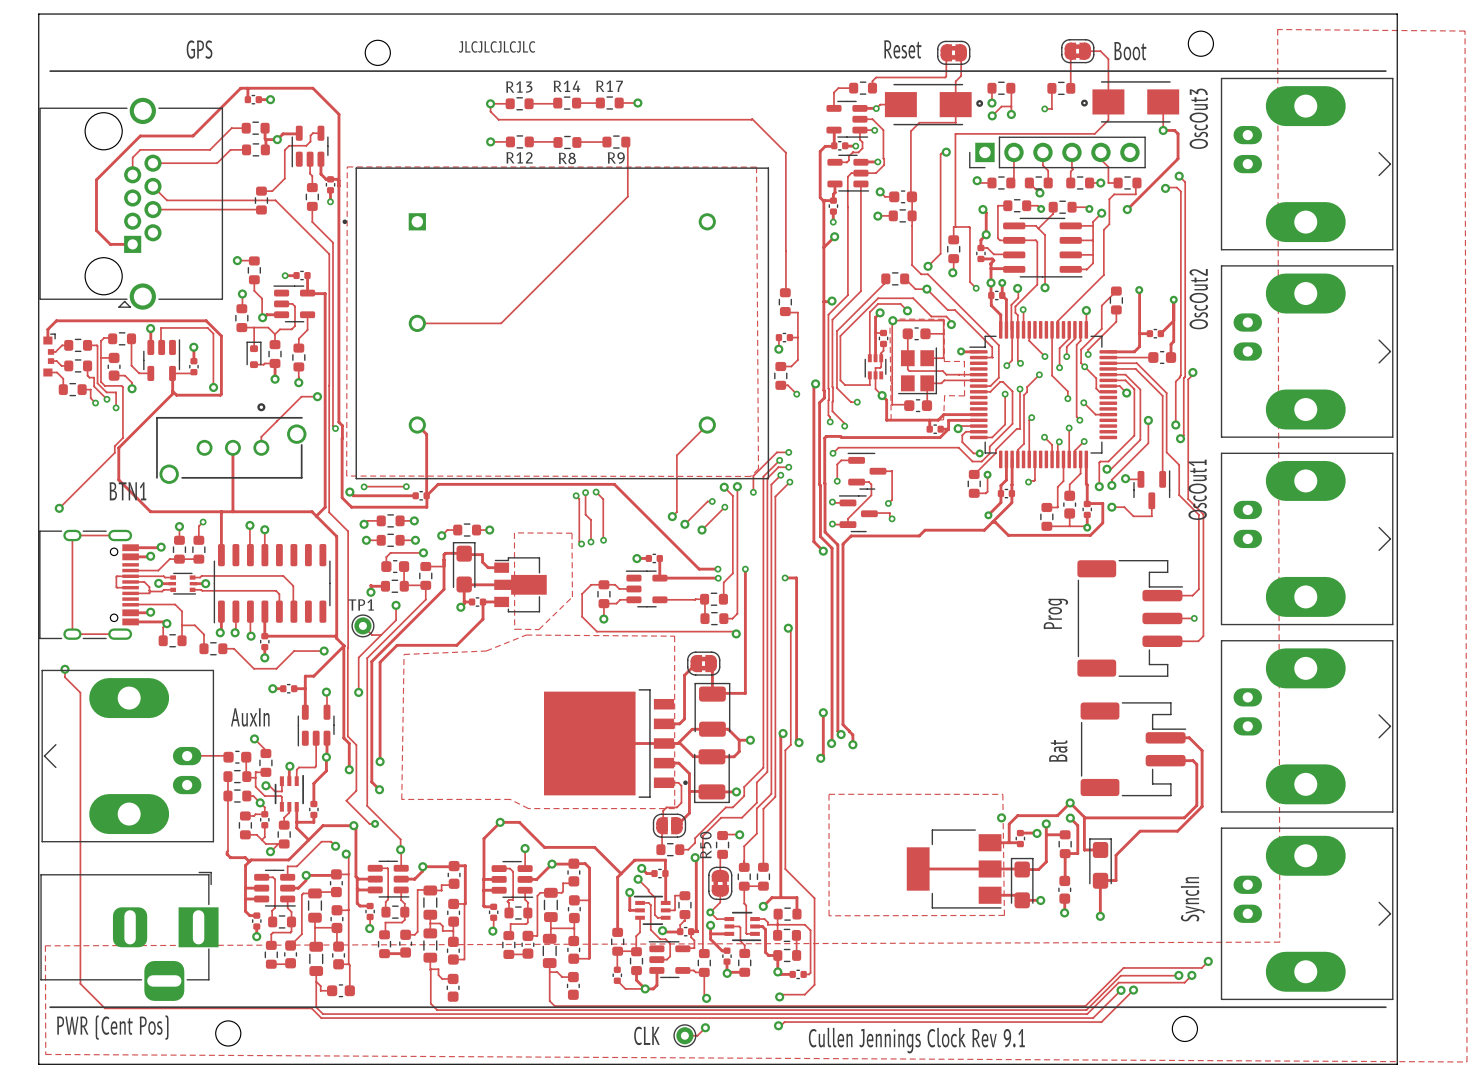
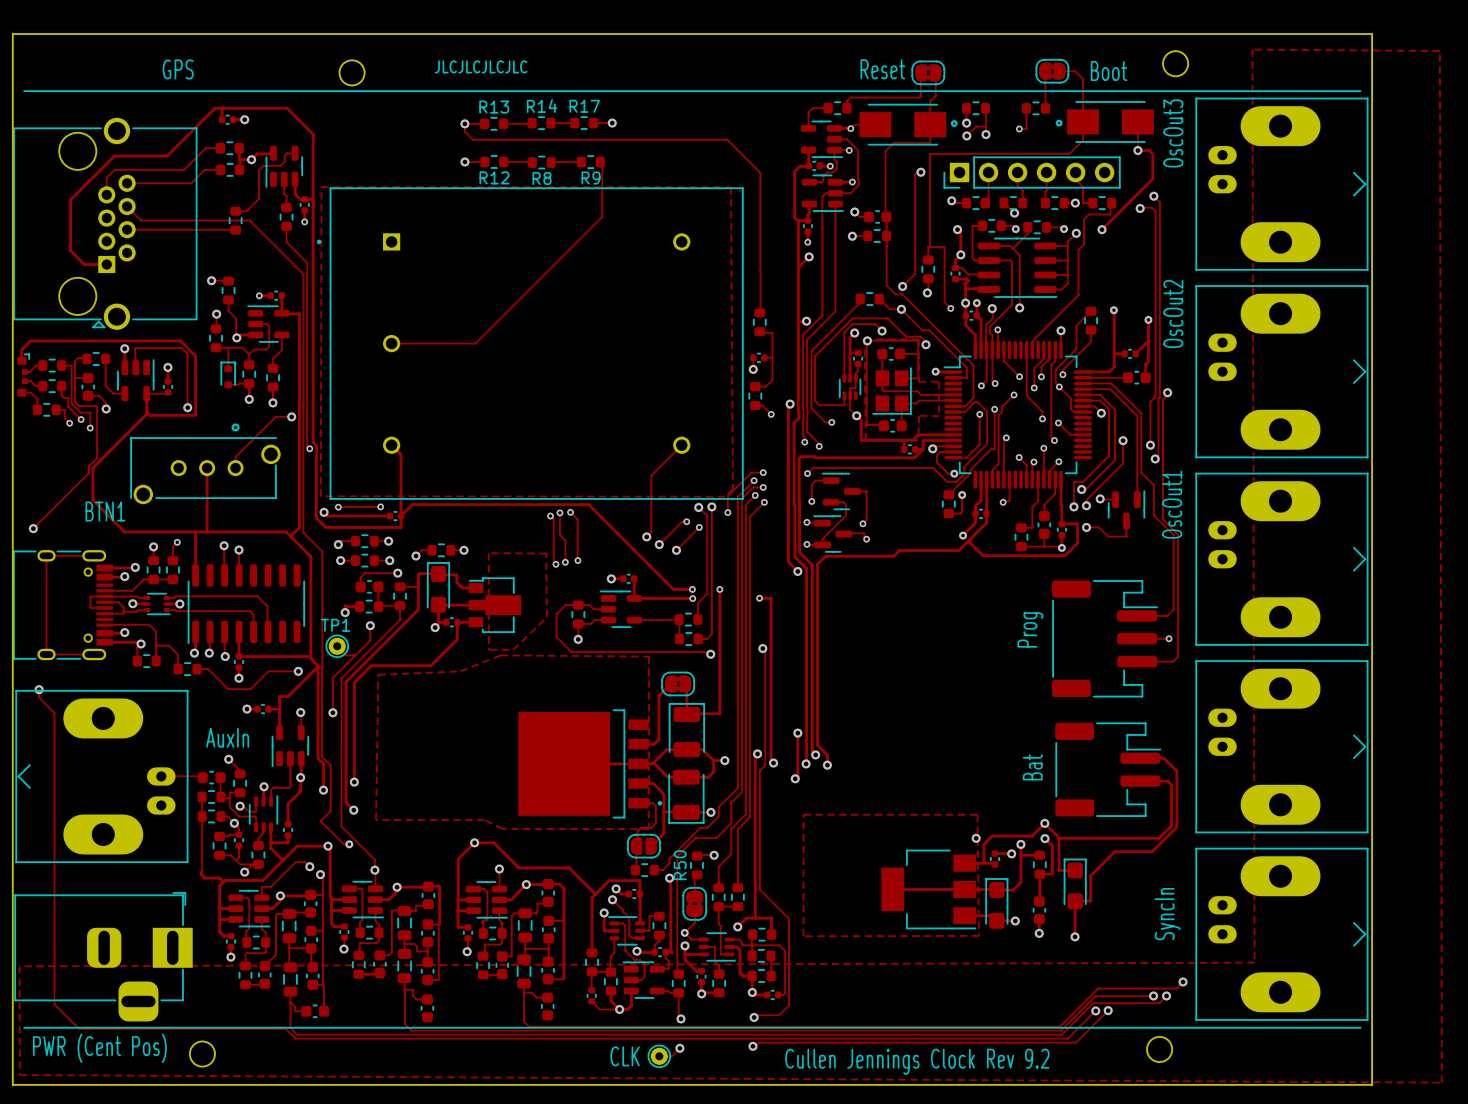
text: Cullen Jennings Clock Rev 9.1 (916, 1040) -> Cullen Jennings Clock Rev 9.2 (917, 1061)

